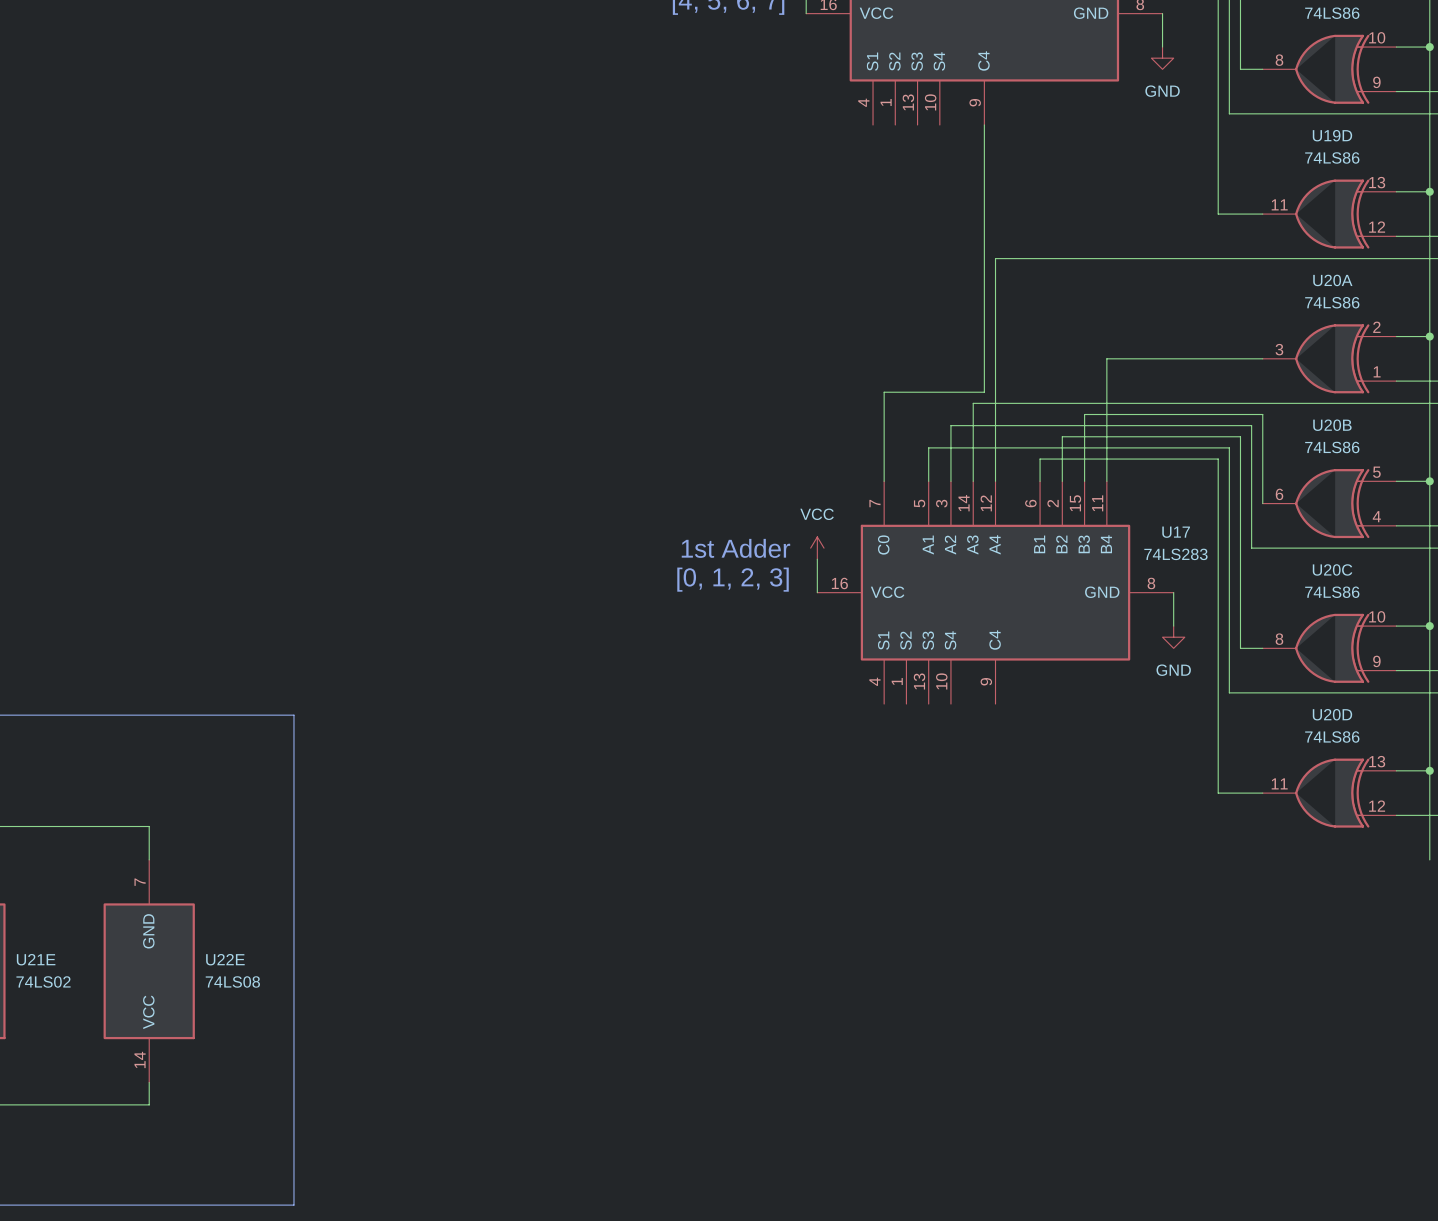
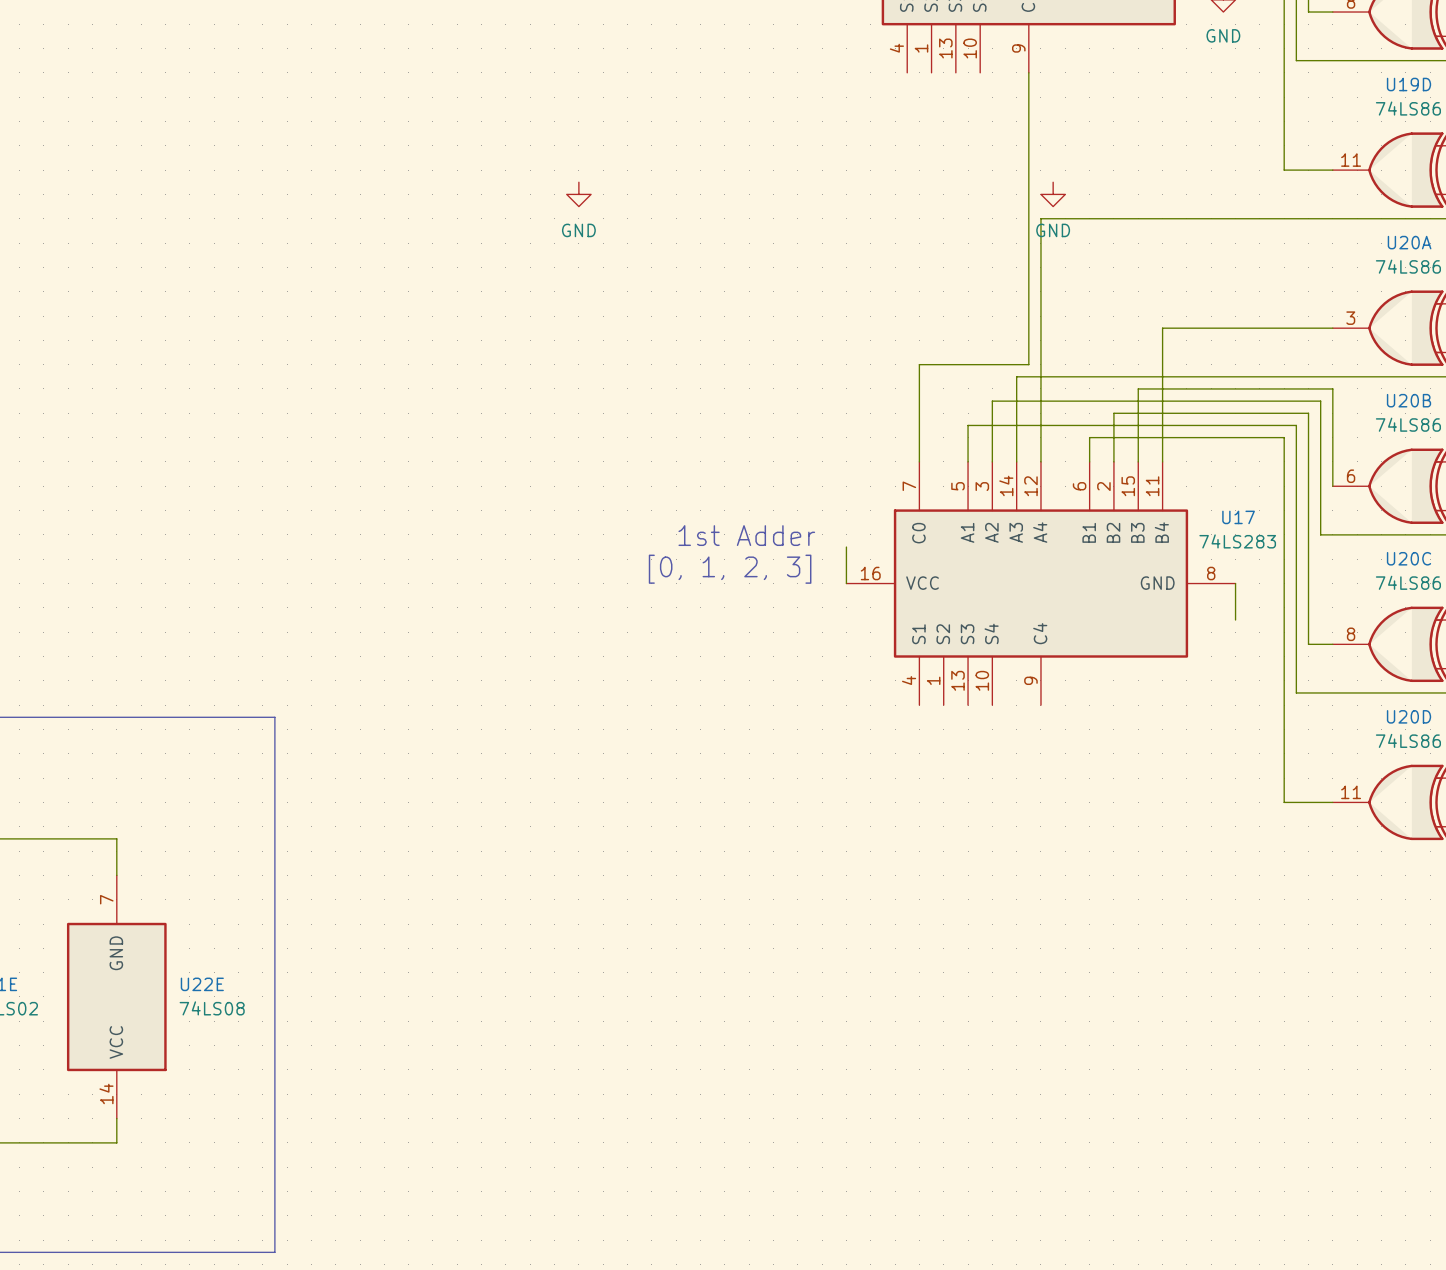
power symbol: none -> GND (578, 194)
power symbol: none -> GND (1053, 194)
power symbol: VCC (817, 548) -> none
power symbol: GND (1173, 637) -> none

